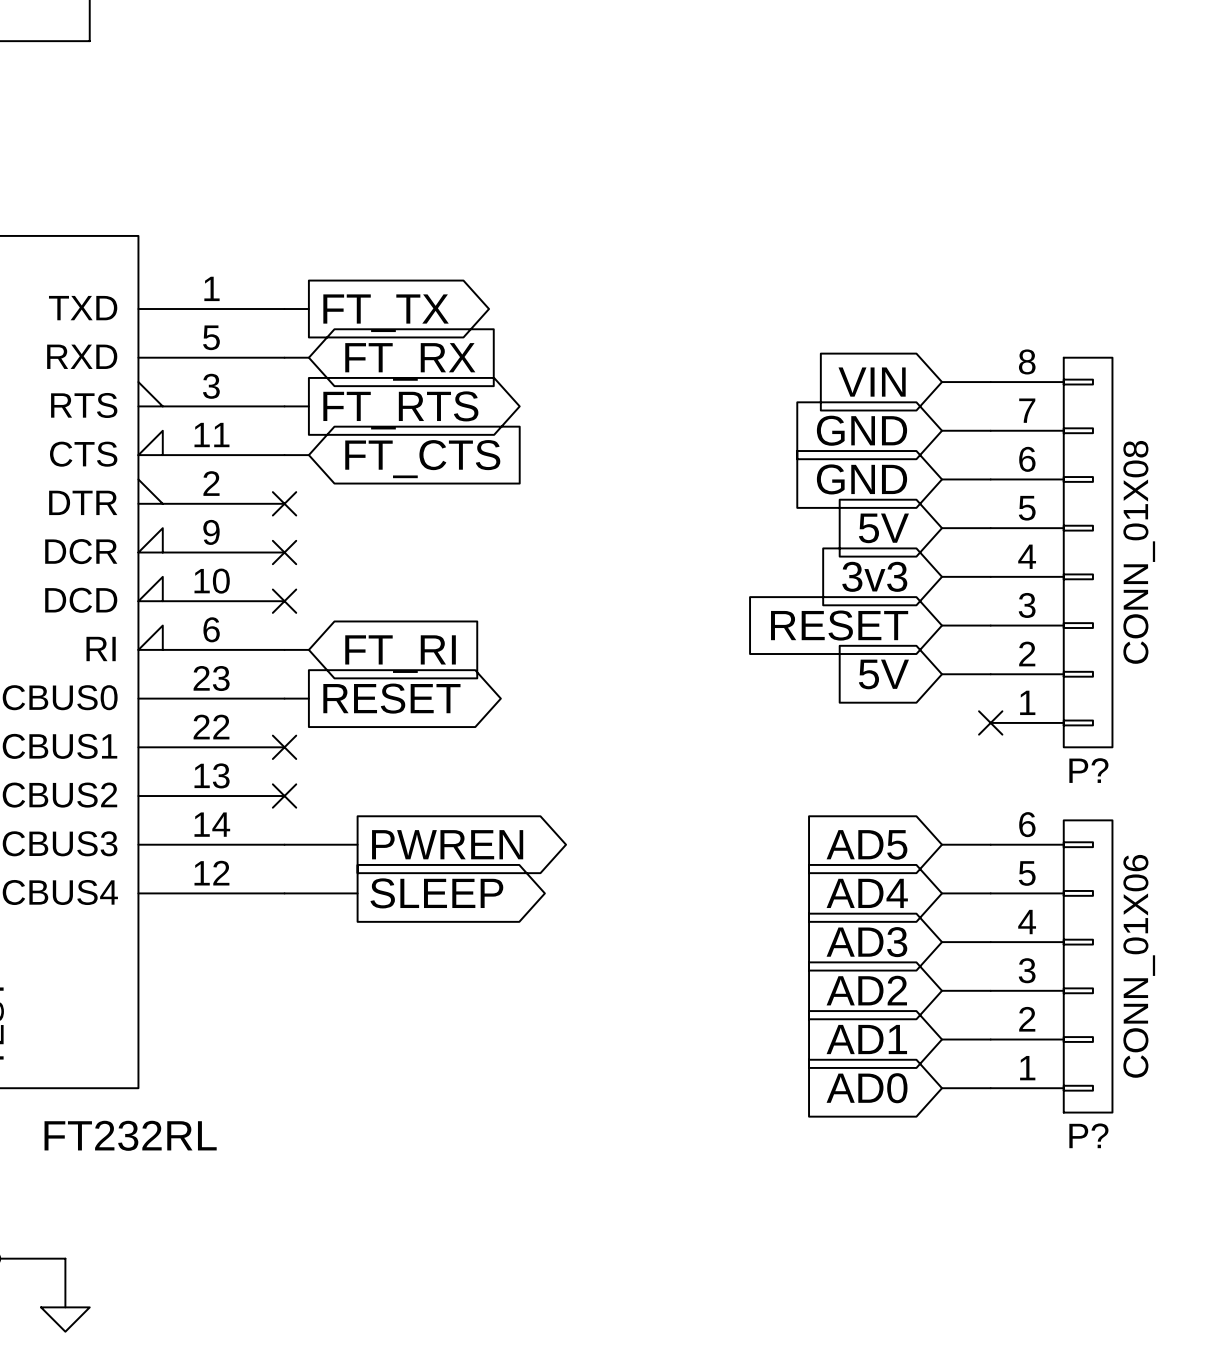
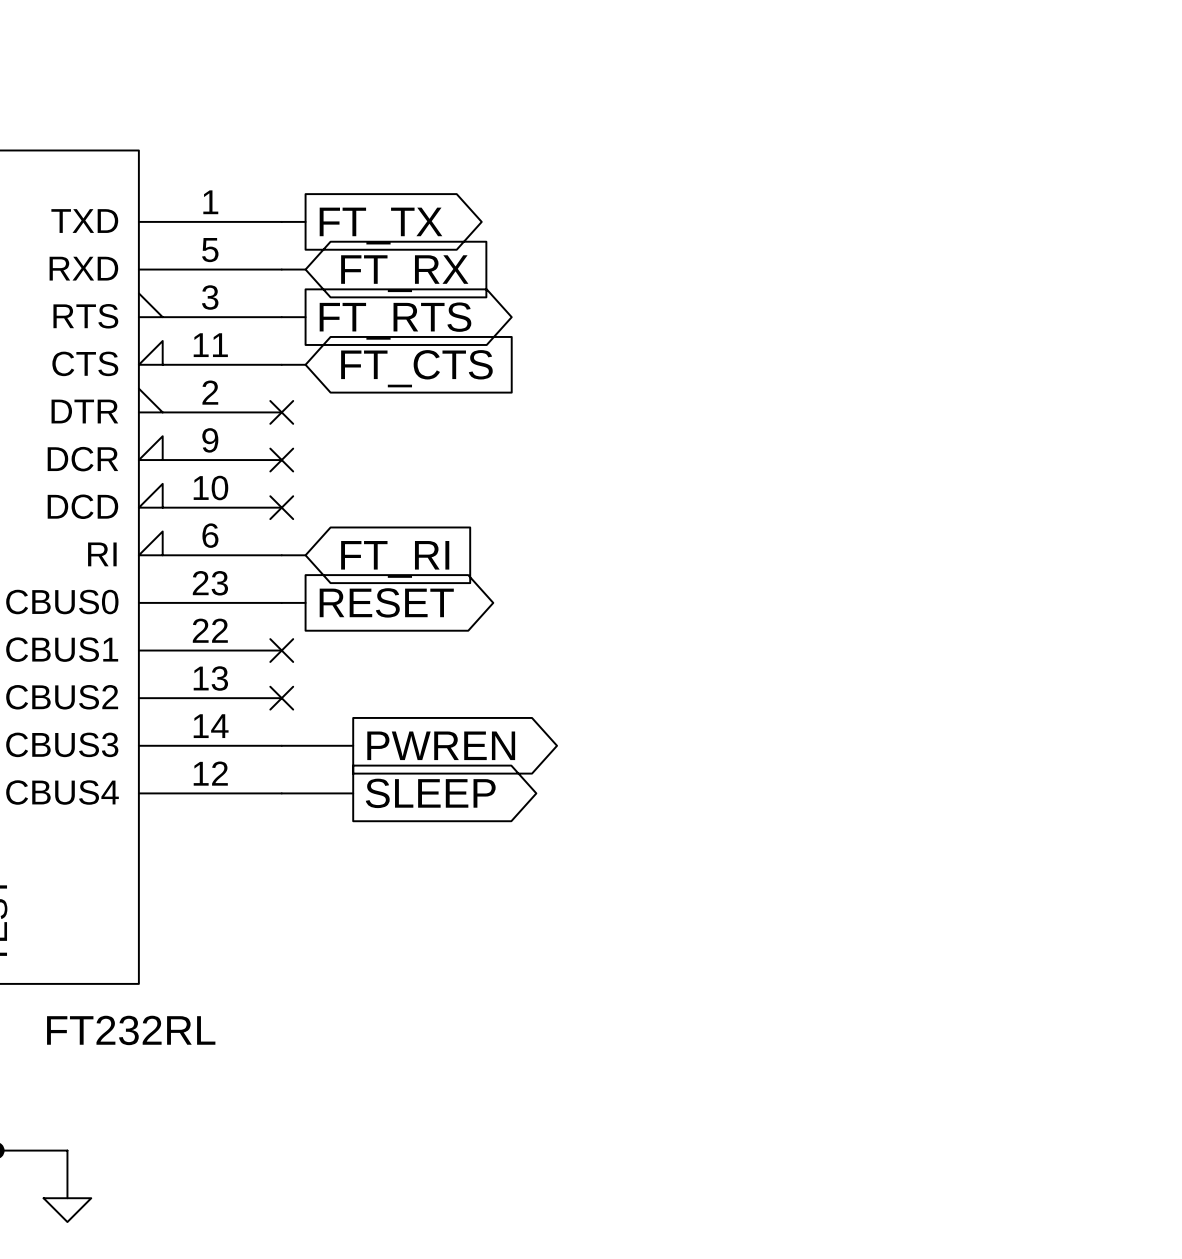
global label: VIN (872, 382) -> none
wire: (942, 382) (990, 382) -> none
global label: GND (862, 430) -> none
wire: (942, 430) (990, 430) -> none
global label: GND (862, 479) -> none
wire: (942, 479) (990, 479) -> none
global label: 5V (883, 528) -> none
wire: (942, 528) (990, 528) -> none
P?: CONN_01X08 (1051, 552) -> none
global label: 3v3 (874, 576) -> none
wire: (942, 576) (990, 576) -> none
global label: RESET (839, 625) -> none
wire: (942, 625) (990, 625) -> none
global label: 5V (883, 674) -> none
wire: (942, 674) (990, 674) -> none
no-connect mark: (990, 722) -> none
global label: AD5 (866, 844) -> none
wire: (942, 844) (990, 844) -> none
global label: AD4 (867, 893) -> none
wire: (942, 893) (990, 893) -> none
global label: AD3 (866, 942) -> none
wire: (942, 942) (990, 942) -> none
P?: CONN_01X06 (1051, 966) -> none
global label: AD2 (866, 990) -> none
wire: (942, 990) (990, 990) -> none
global label: AD1 (866, 1039) -> none
wire: (942, 1039) (990, 1039) -> none
global label: AD0 (867, 1088) -> none
wire: (942, 1088) (990, 1088) -> none

